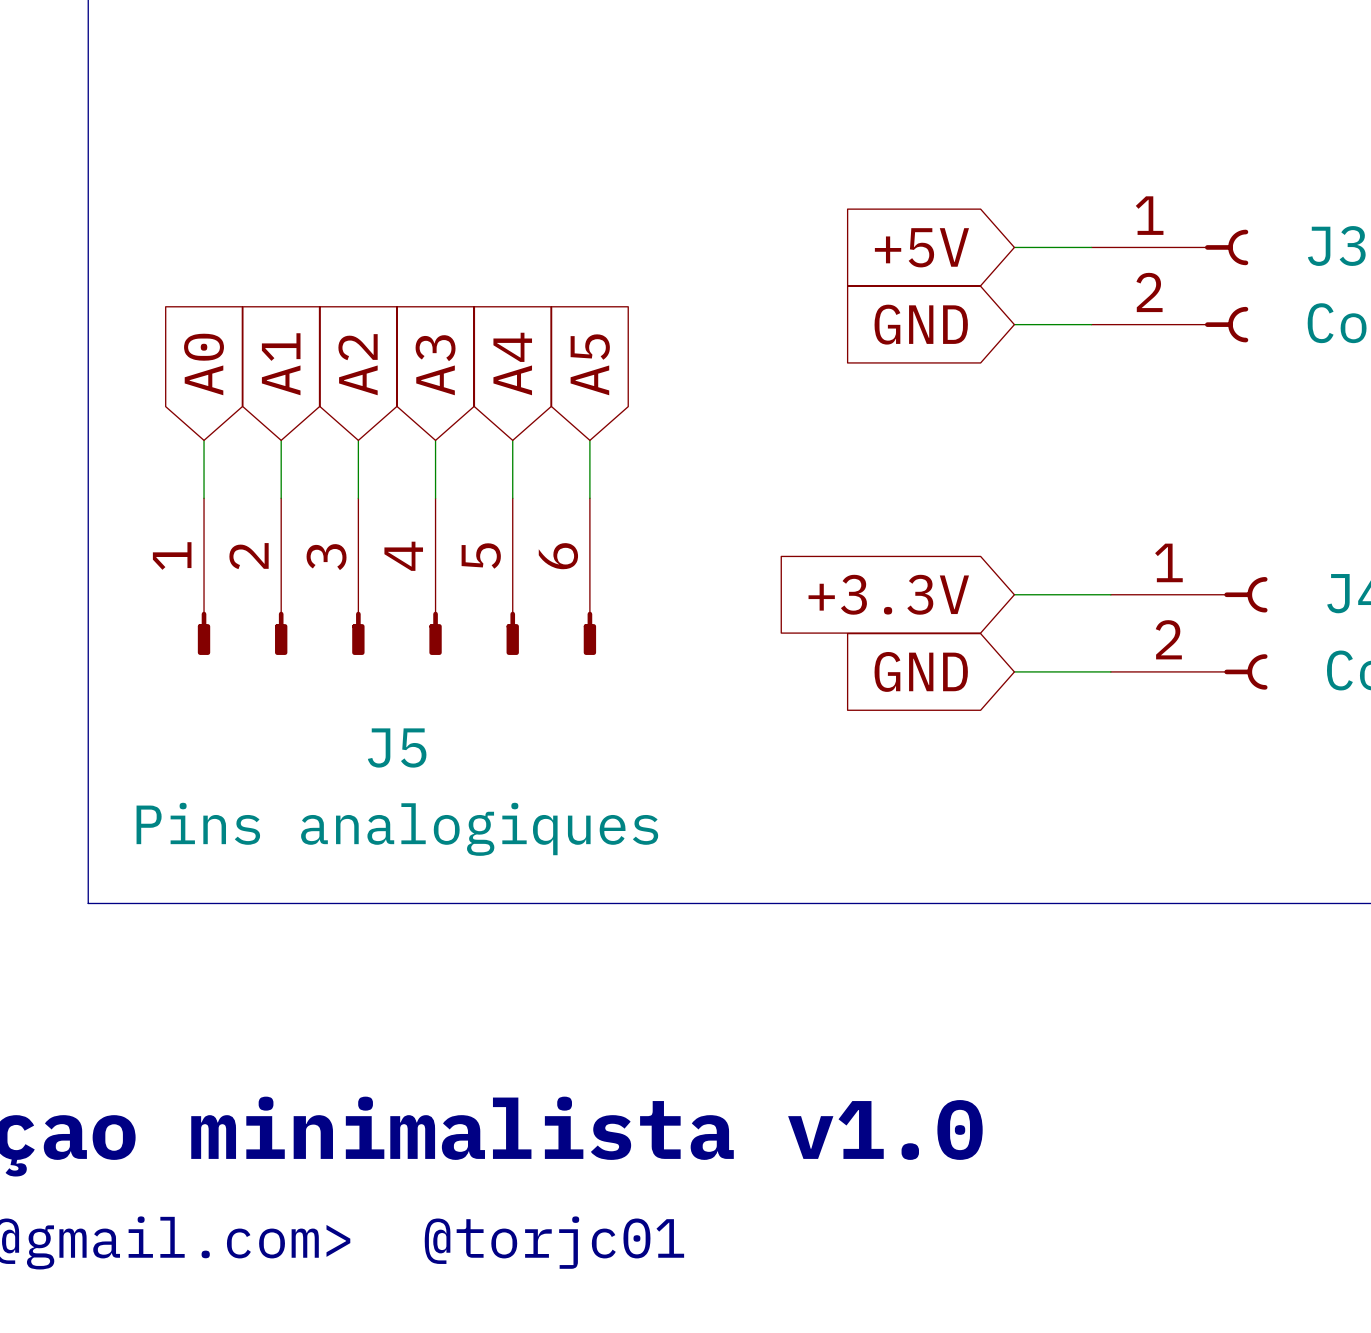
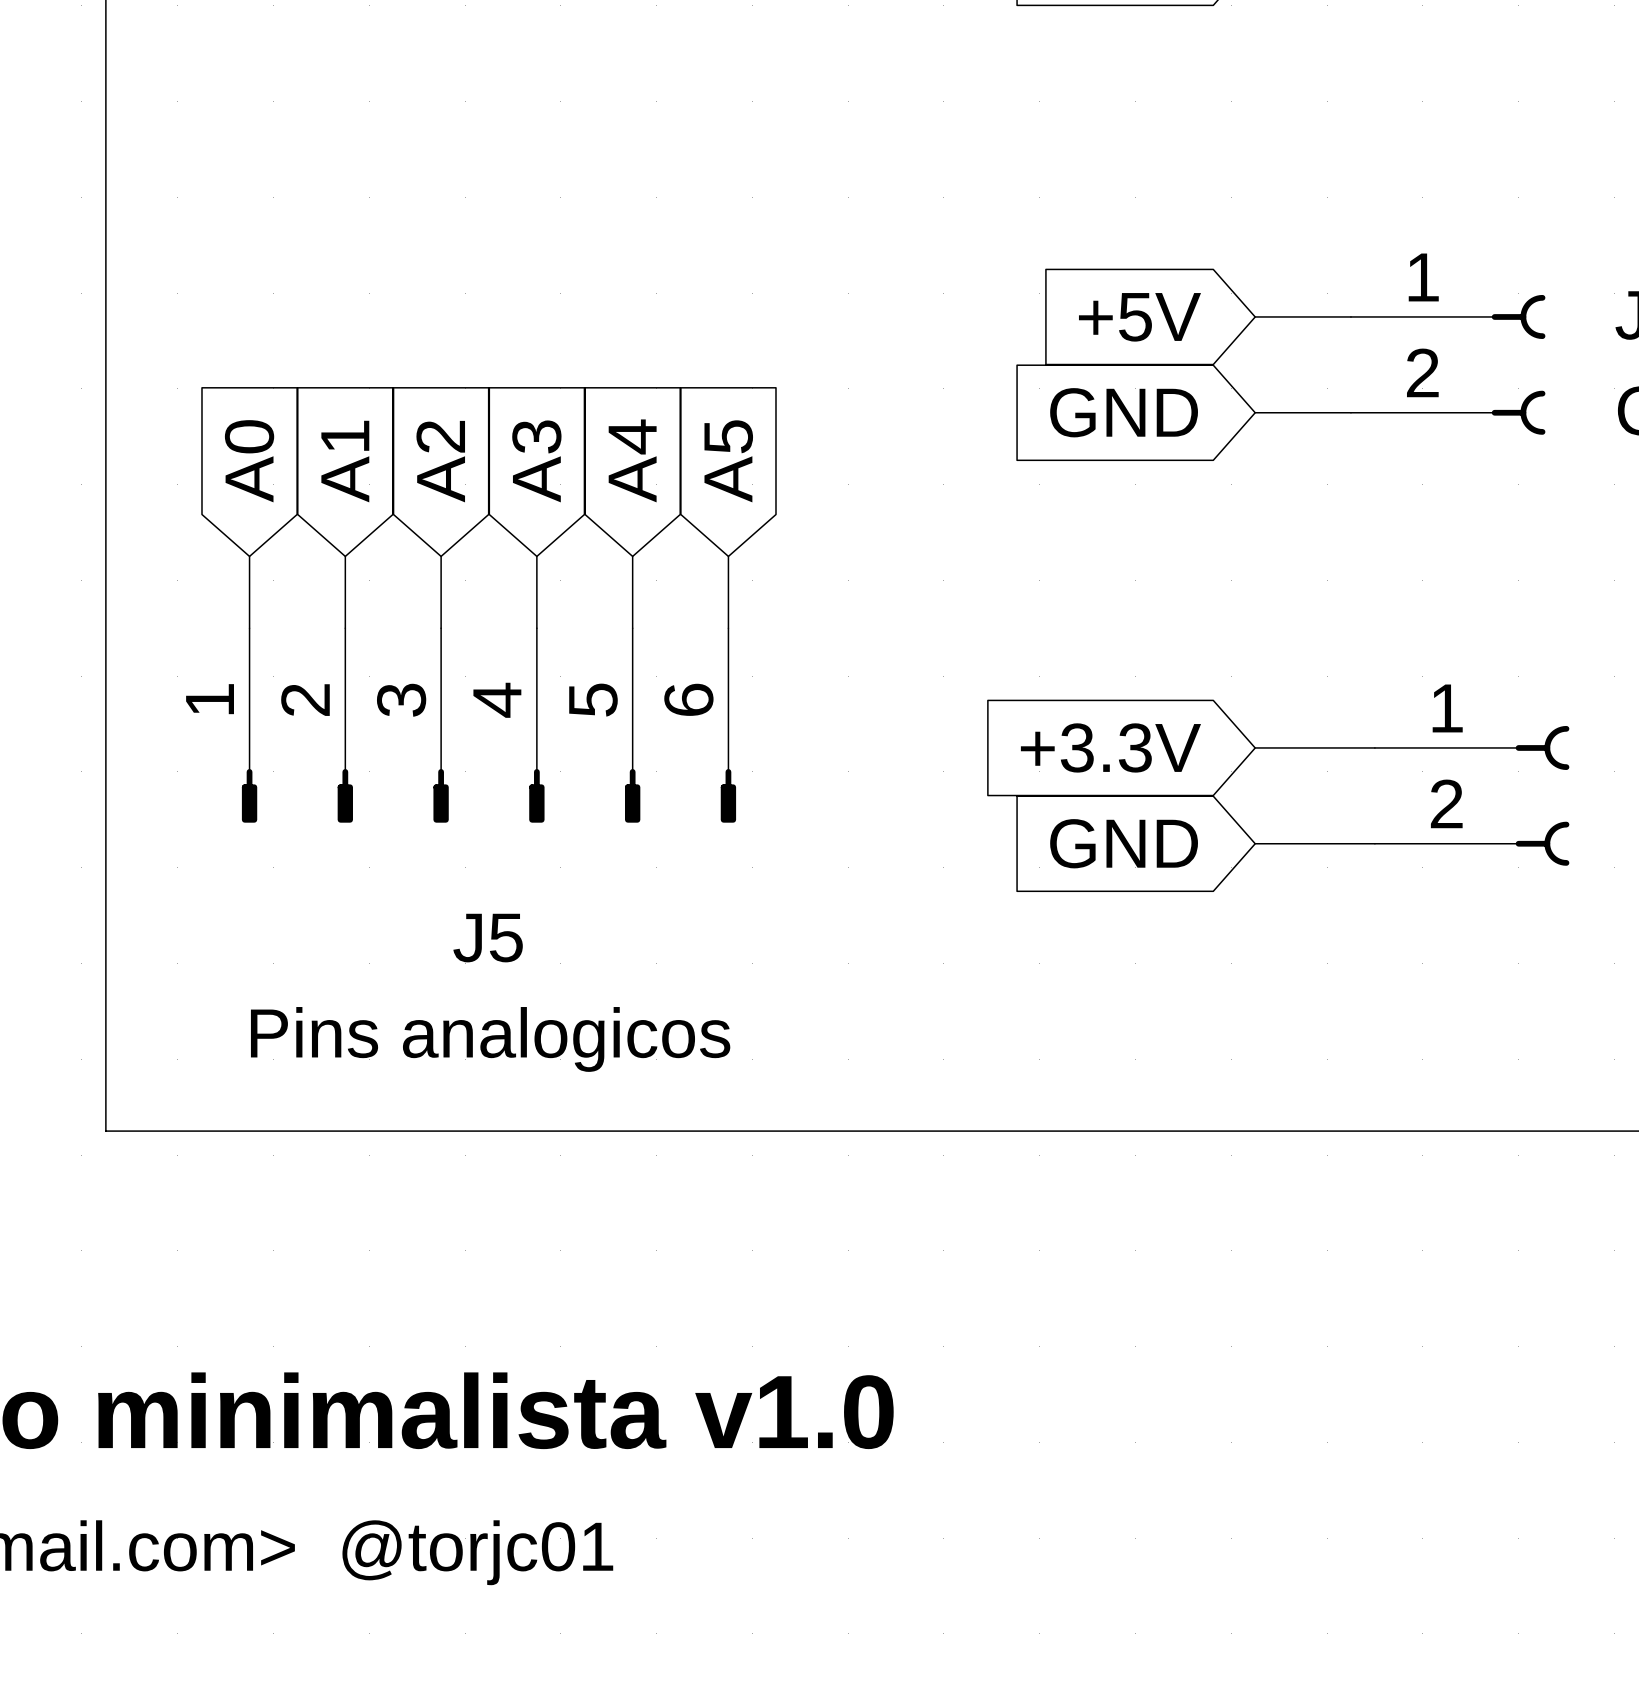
J5 value: Pins analogiques (397, 829) -> Pins analogicos (490, 1039)

